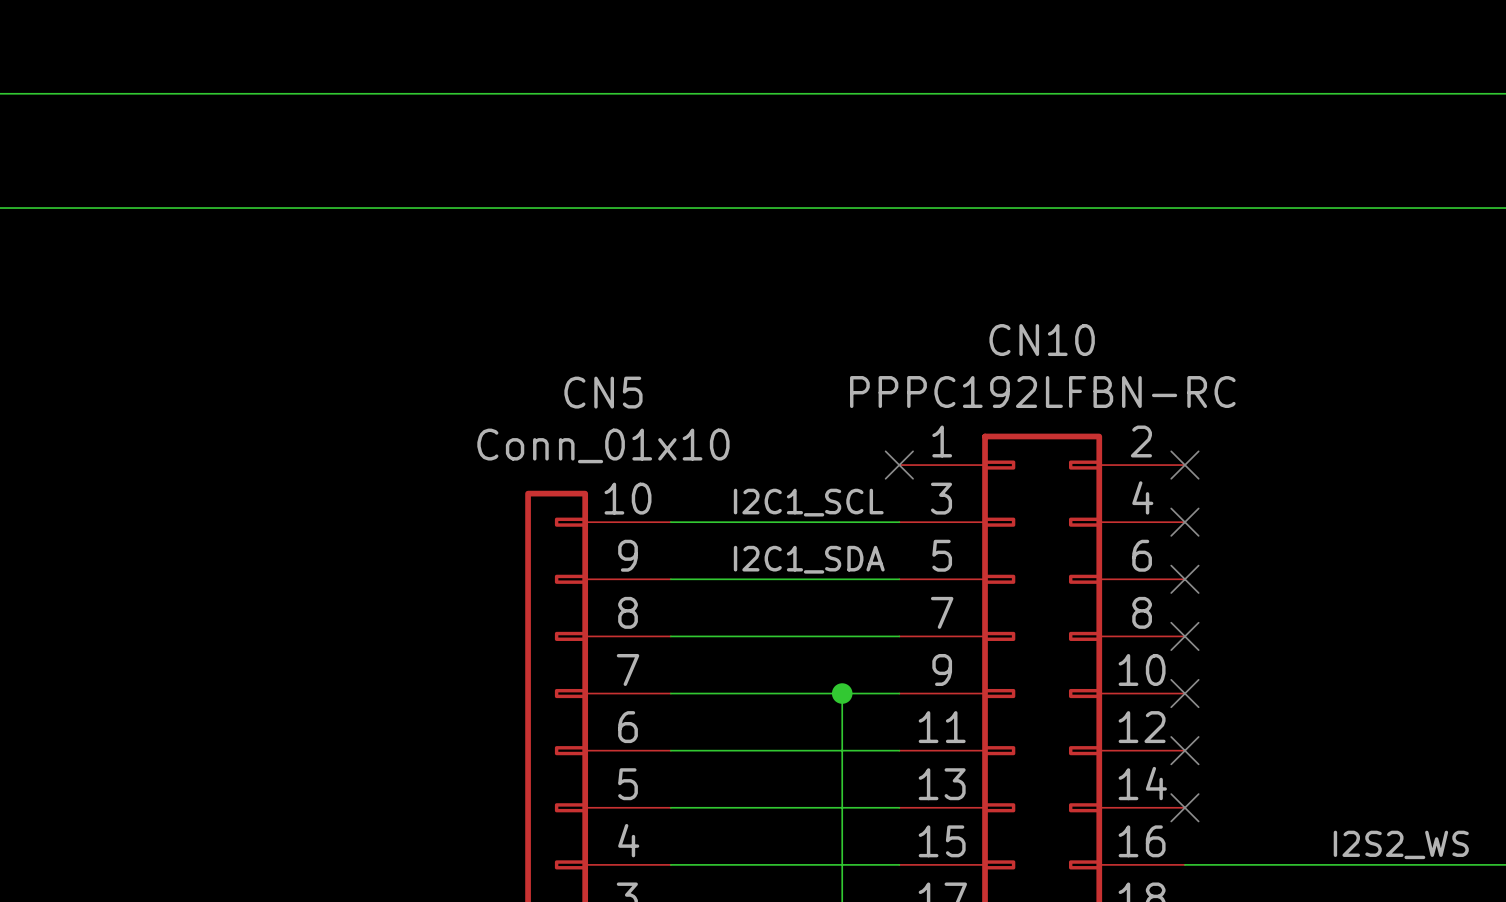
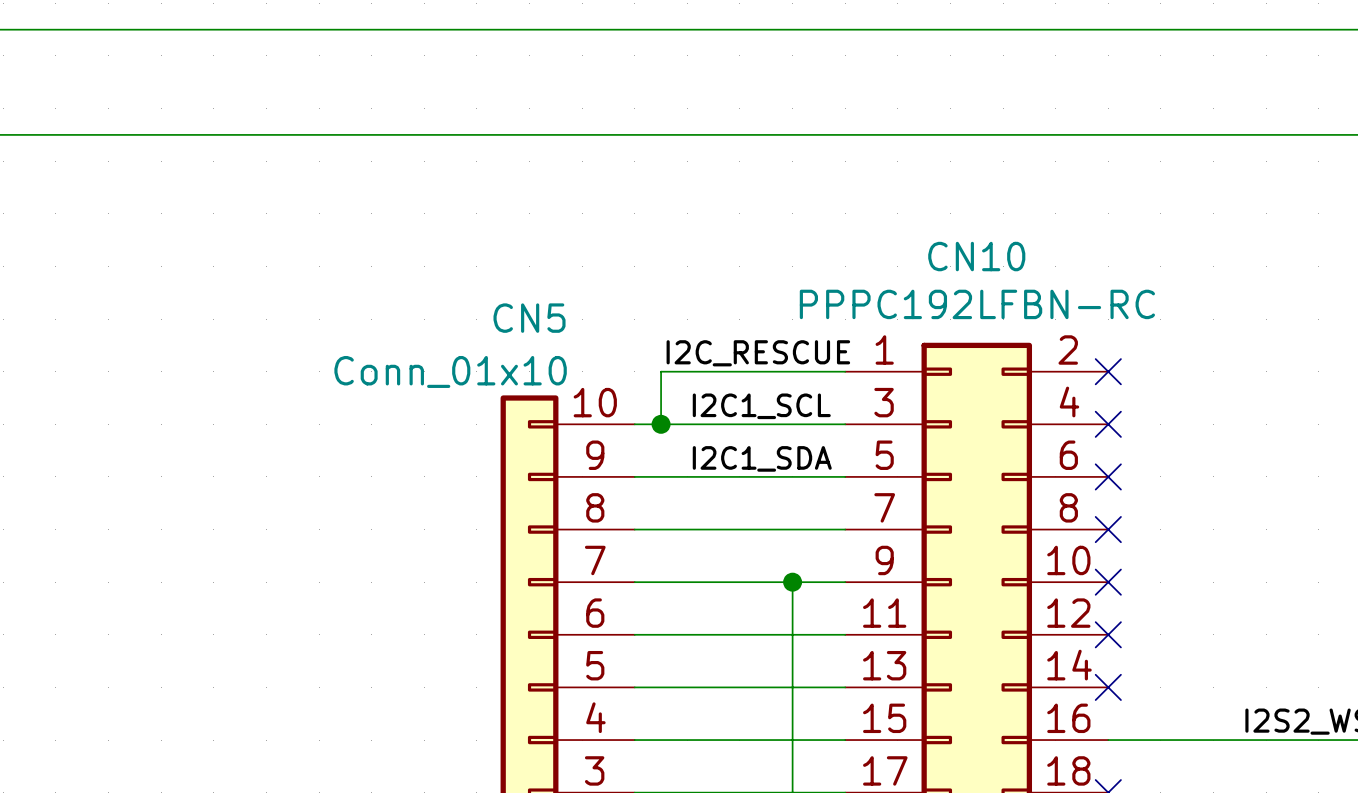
CN5 name position: CN5 (603, 392) -> CN5 (529, 318)
CN5 value position: Conn_01x10 (603, 445) -> Conn_01x10 (450, 371)
label: none -> I2C_RESCUE (758, 353)
wire: none -> (845, 371) (661, 371) (661, 424)
no-connect mark: (899, 465) -> none
junction: none -> (661, 424)

